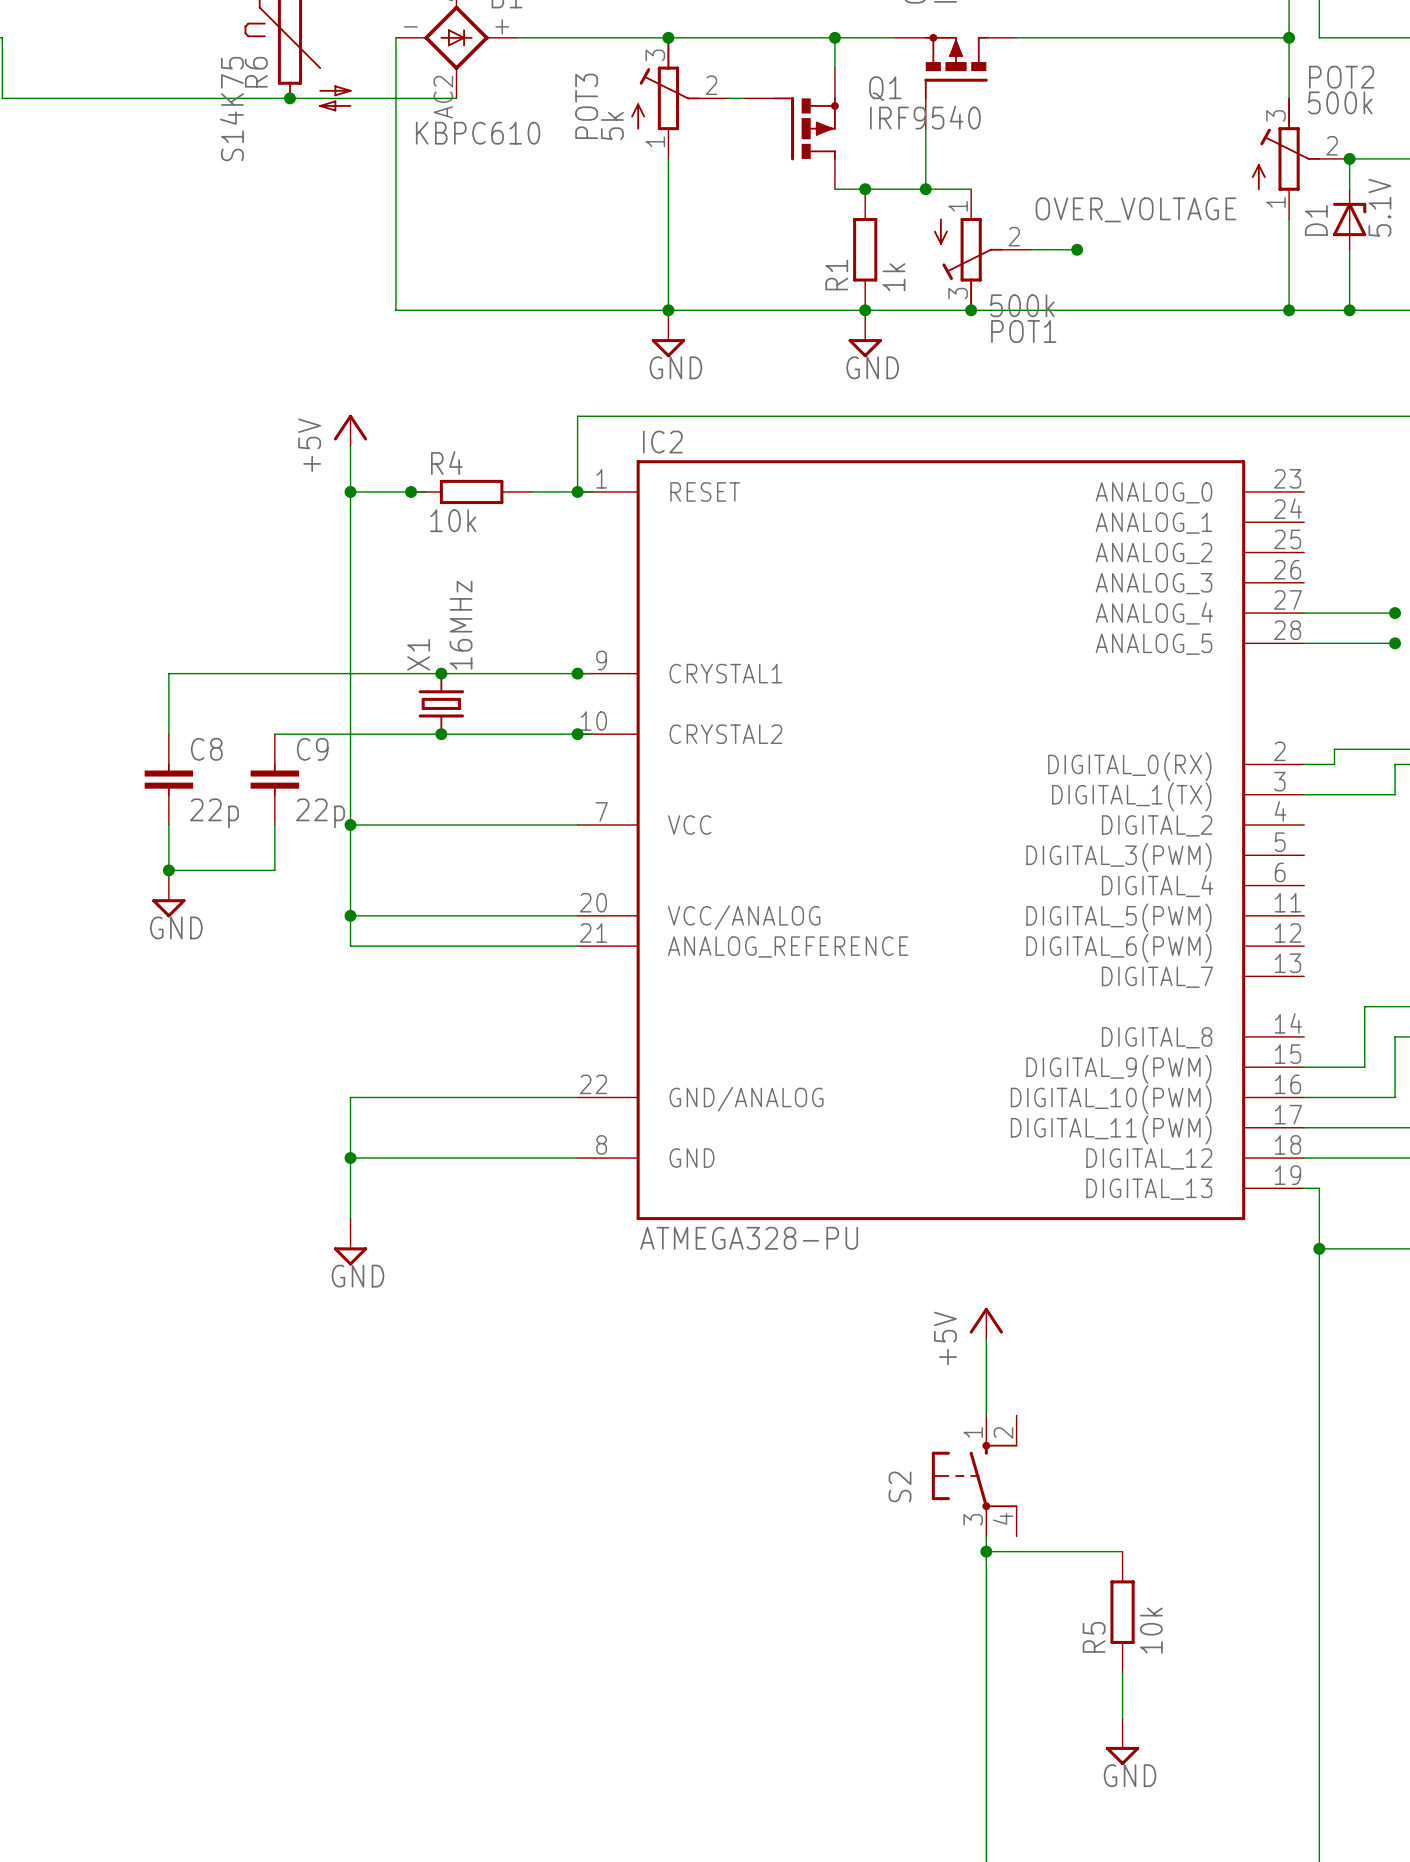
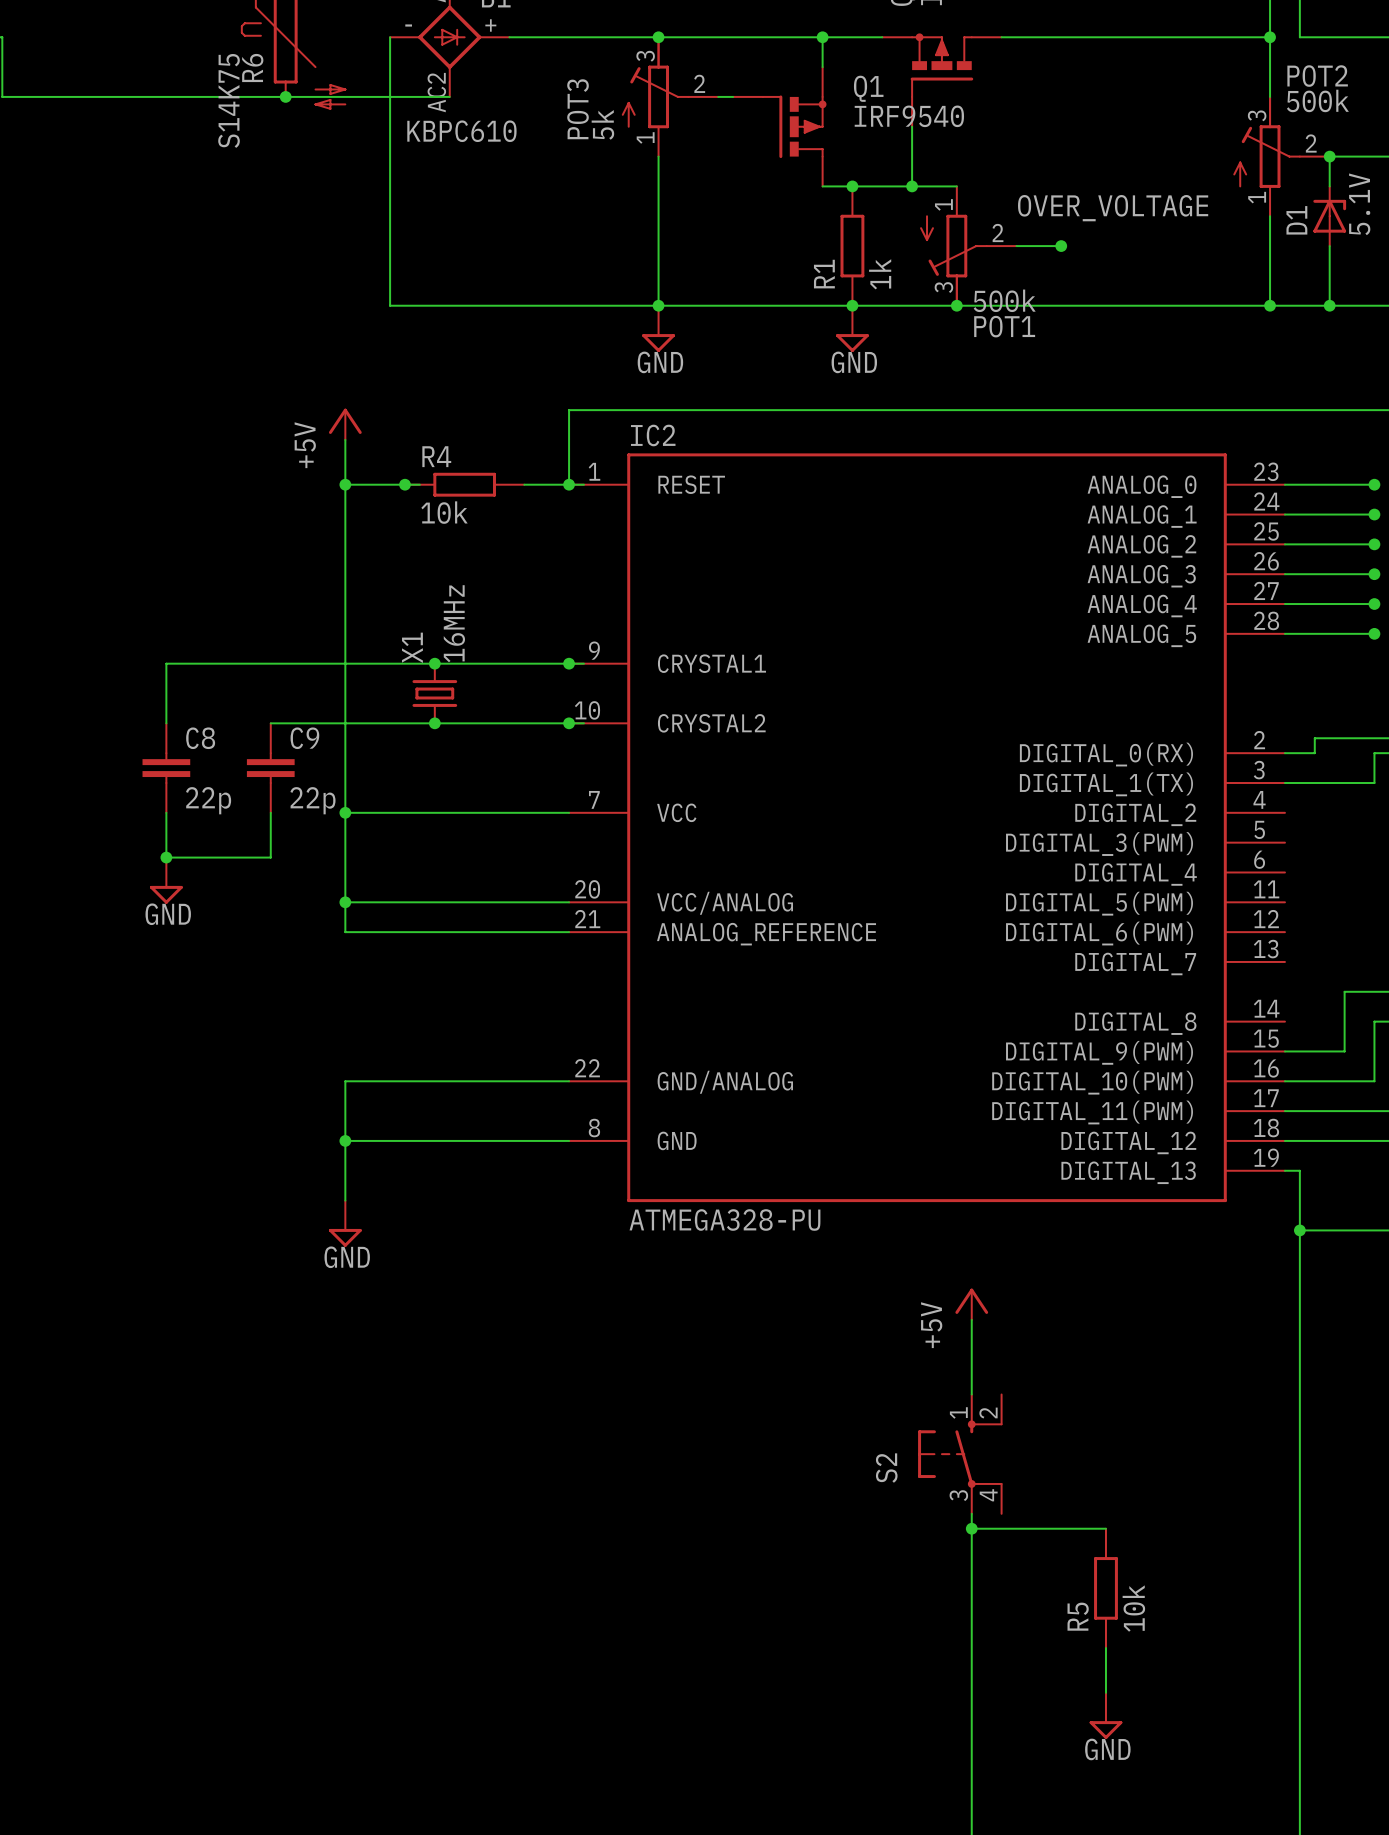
wire: none -> (1284, 484) (1374, 484)
junction: none -> (1374, 484)
wire: none -> (1284, 514) (1374, 514)
junction: none -> (1374, 514)
wire: none -> (1284, 544) (1374, 544)
junction: none -> (1374, 544)
wire: none -> (1284, 574) (1374, 574)
junction: none -> (1374, 574)

